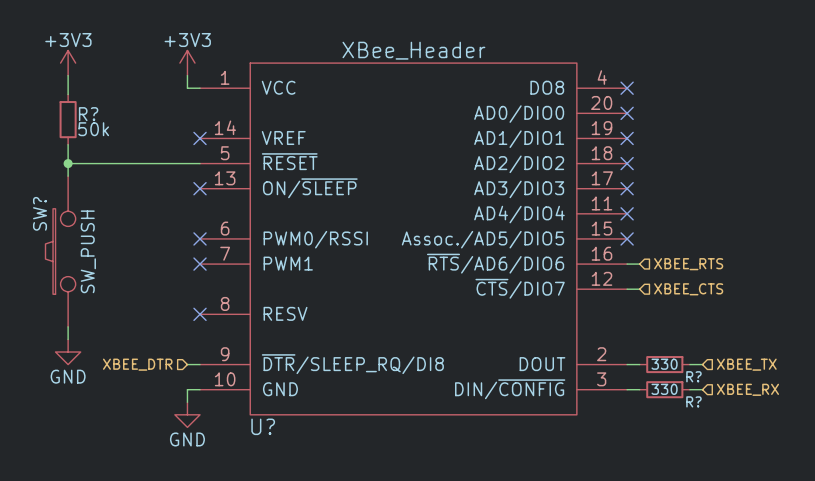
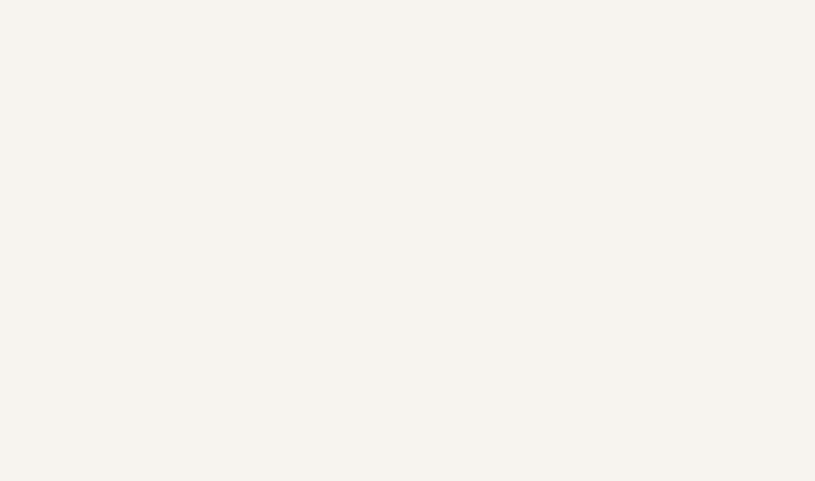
power symbol: +3V3 (68, 63) -> none
power symbol: +3V3 (187, 63) -> none
wire: (68, 75) (68, 94) -> none
wire: (187, 75) (187, 88) (200, 88) -> none
no-connect mark: (627, 88) -> none
no-connect mark: (627, 113) -> none
R?: 50k (68, 119) -> none
no-connect mark: (200, 138) -> none
no-connect mark: (627, 138) -> none
wire: (68, 144) (68, 176) -> none
wire: (68, 163) (200, 163) -> none
junction: (68, 163) -> none
no-connect mark: (627, 163) -> none
no-connect mark: (200, 188) -> none
no-connect mark: (627, 188) -> none
no-connect mark: (627, 213) -> none
no-connect mark: (200, 238) -> none
U?: XBee_Header (413, 238) -> none
no-connect mark: (627, 238) -> none
SW?: SW_PUSH (60, 251) -> none
no-connect mark: (200, 264) -> none
wire: (627, 264) (639, 264) -> none
hierarchical label: XBEE_RTS (688, 264) -> none
wire: (627, 289) (639, 289) -> none
hierarchical label: XBEE_CTS (688, 289) -> none
no-connect mark: (200, 314) -> none
wire: (68, 326) (68, 339) -> none
power symbol: GND (68, 352) -> none
hierarchical label: XBEE_DTR (137, 364) -> none
wire: (187, 364) (200, 364) -> none
wire: (627, 364) (639, 364) -> none
R?: 330 (664, 364) -> none
wire: (689, 364) (702, 364) -> none
hierarchical label: XBEE_TX (746, 364) -> none
wire: (200, 389) (187, 389) (187, 402) -> none
wire: (627, 389) (639, 389) -> none
R?: 330 (664, 389) -> none
wire: (689, 389) (702, 389) -> none
hierarchical label: XBEE_RX (747, 389) -> none
power symbol: GND (187, 414) -> none

